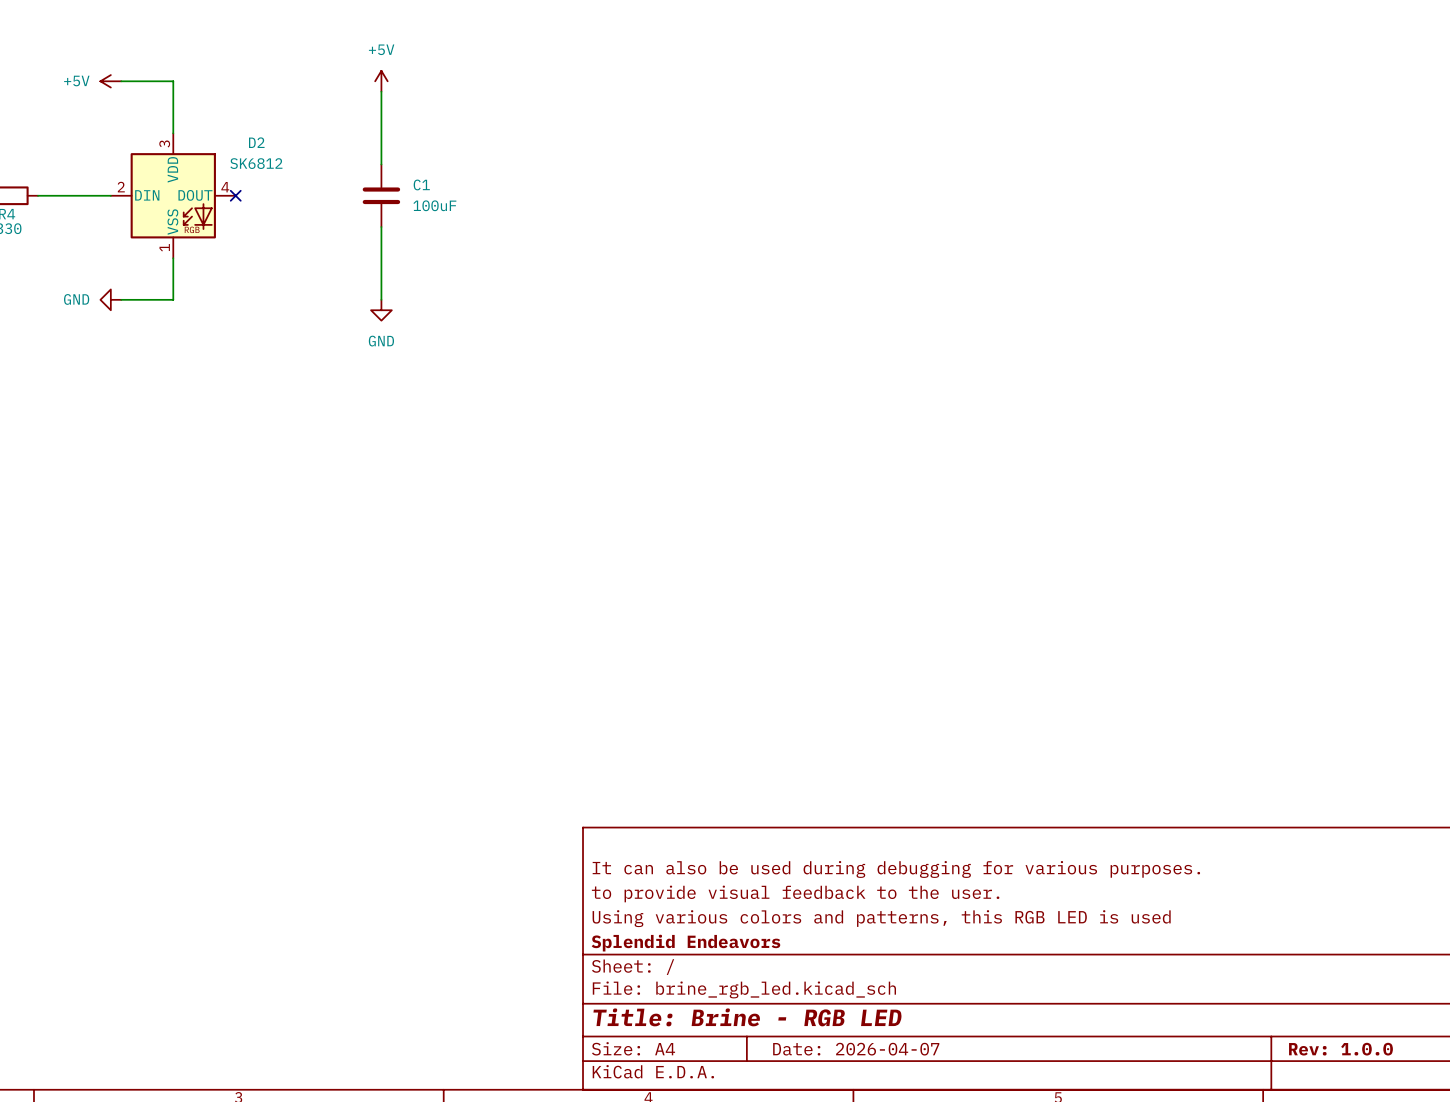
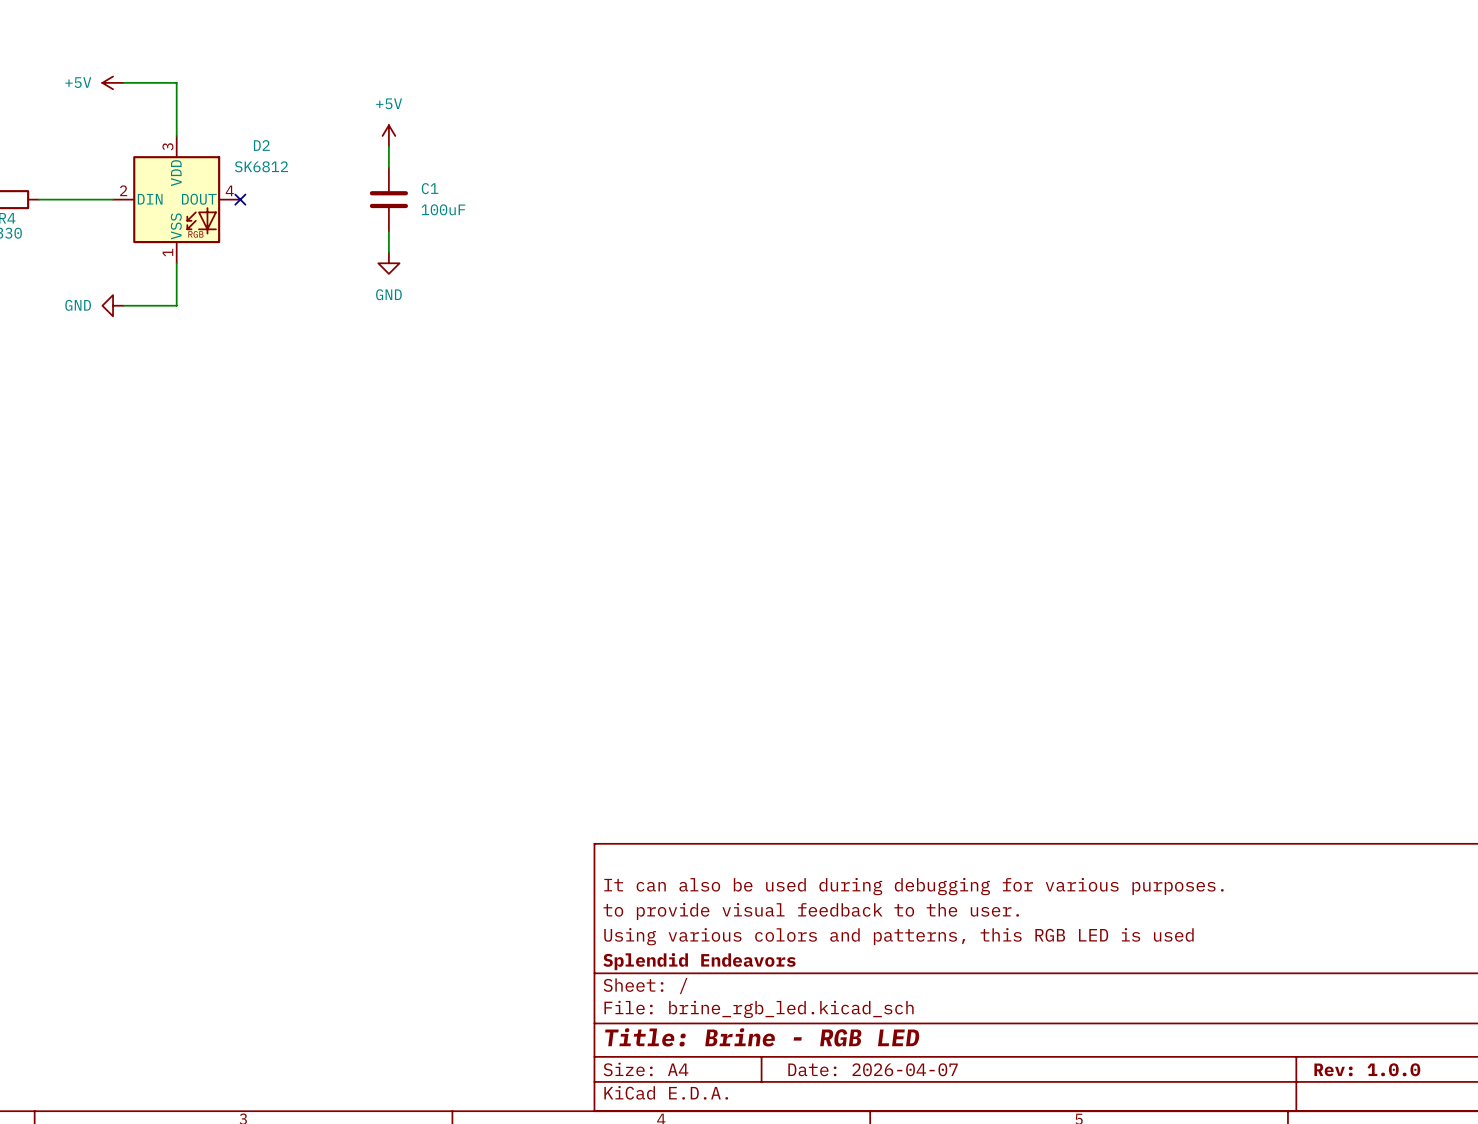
power symbol position: +5V (381, 81) -> +5V (388, 135)
wire: (381, 91) (381, 143) -> none
wire: (381, 247) (381, 299) -> none
power symbol position: GND (381, 310) -> GND (388, 263)

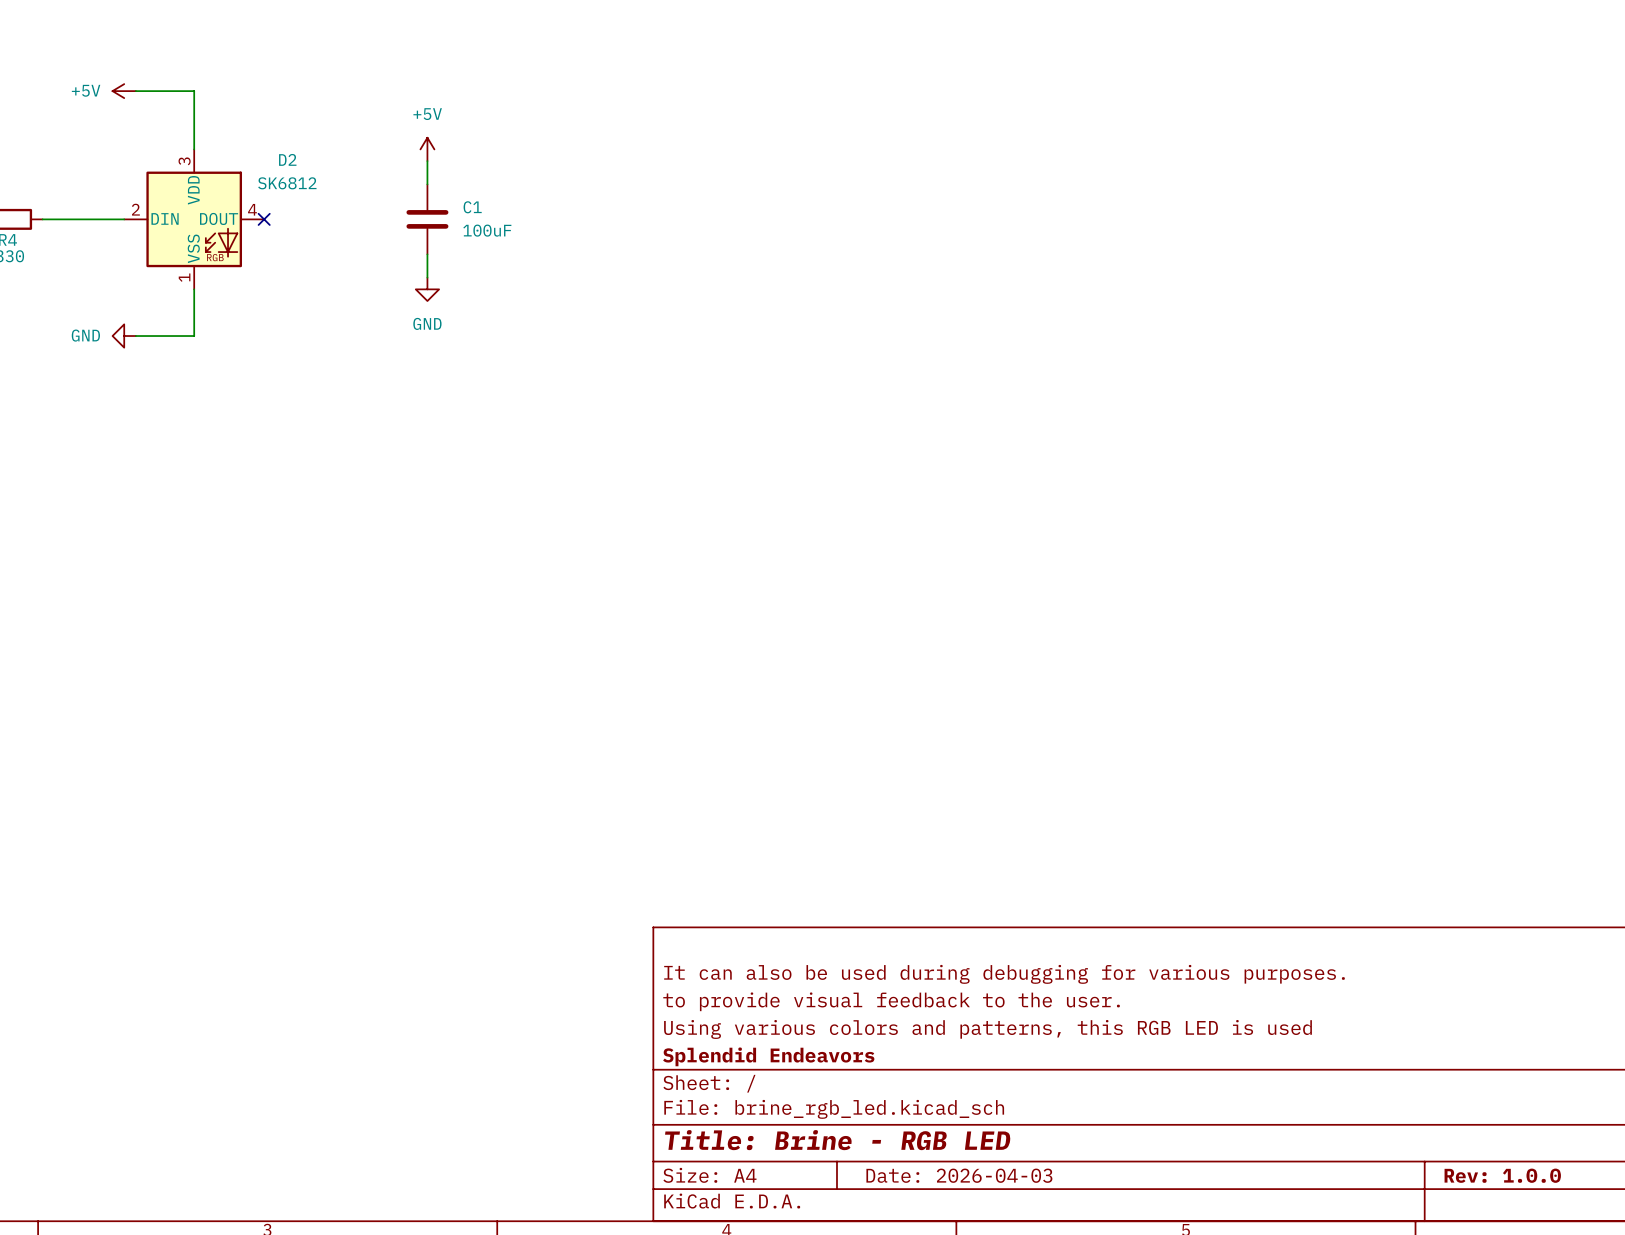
title block: Date: 2026-04-07 (873, 1069) -> Date: 2026-04-03 (959, 1175)

